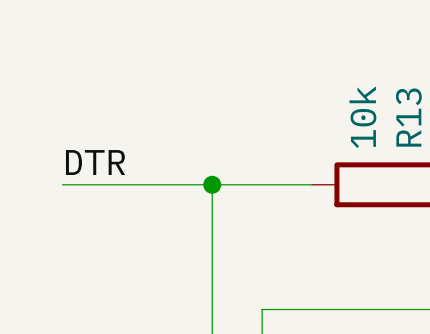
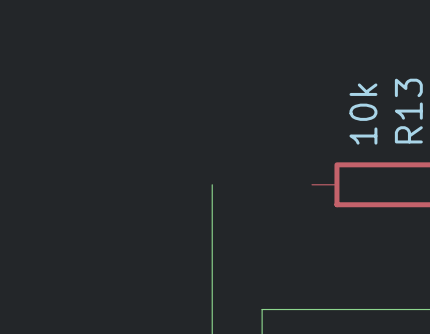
label: DTR (95, 162) -> none
wire: (62, 184) (312, 184) -> none
junction: (212, 184) -> none

